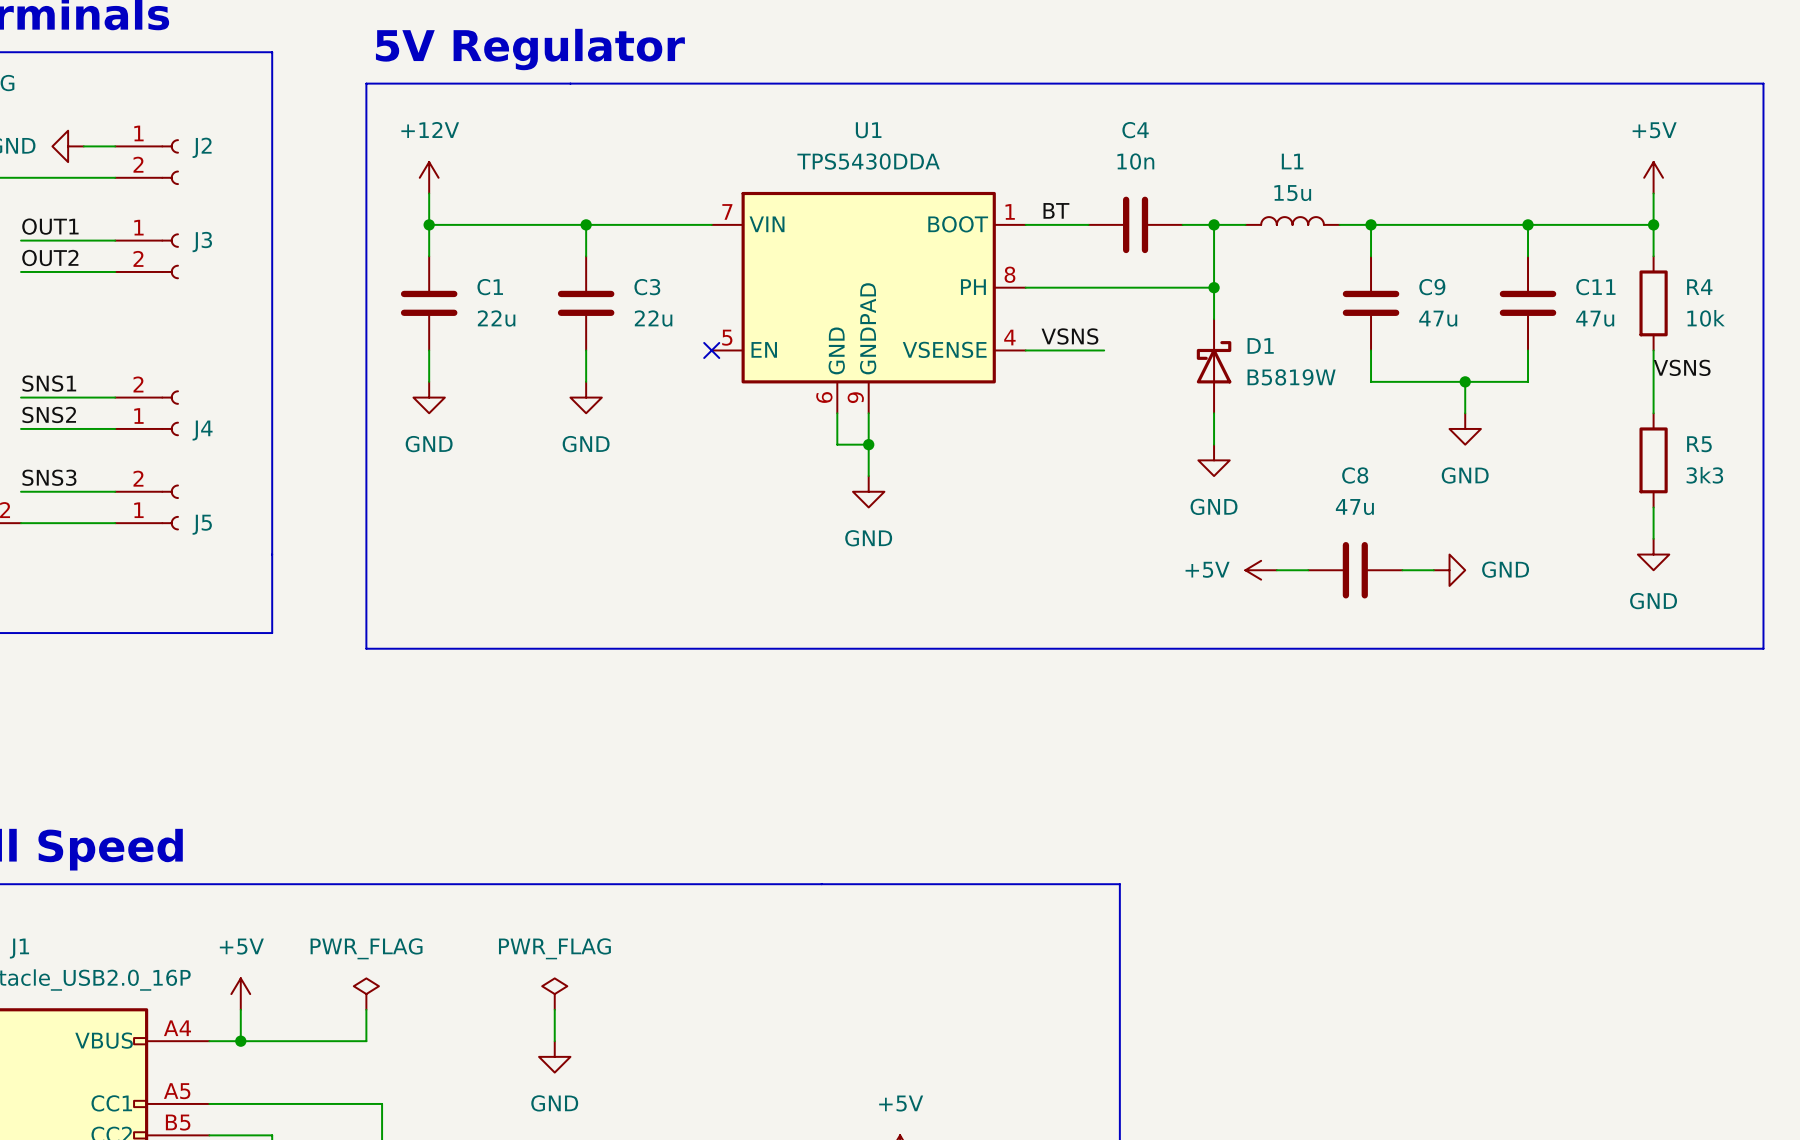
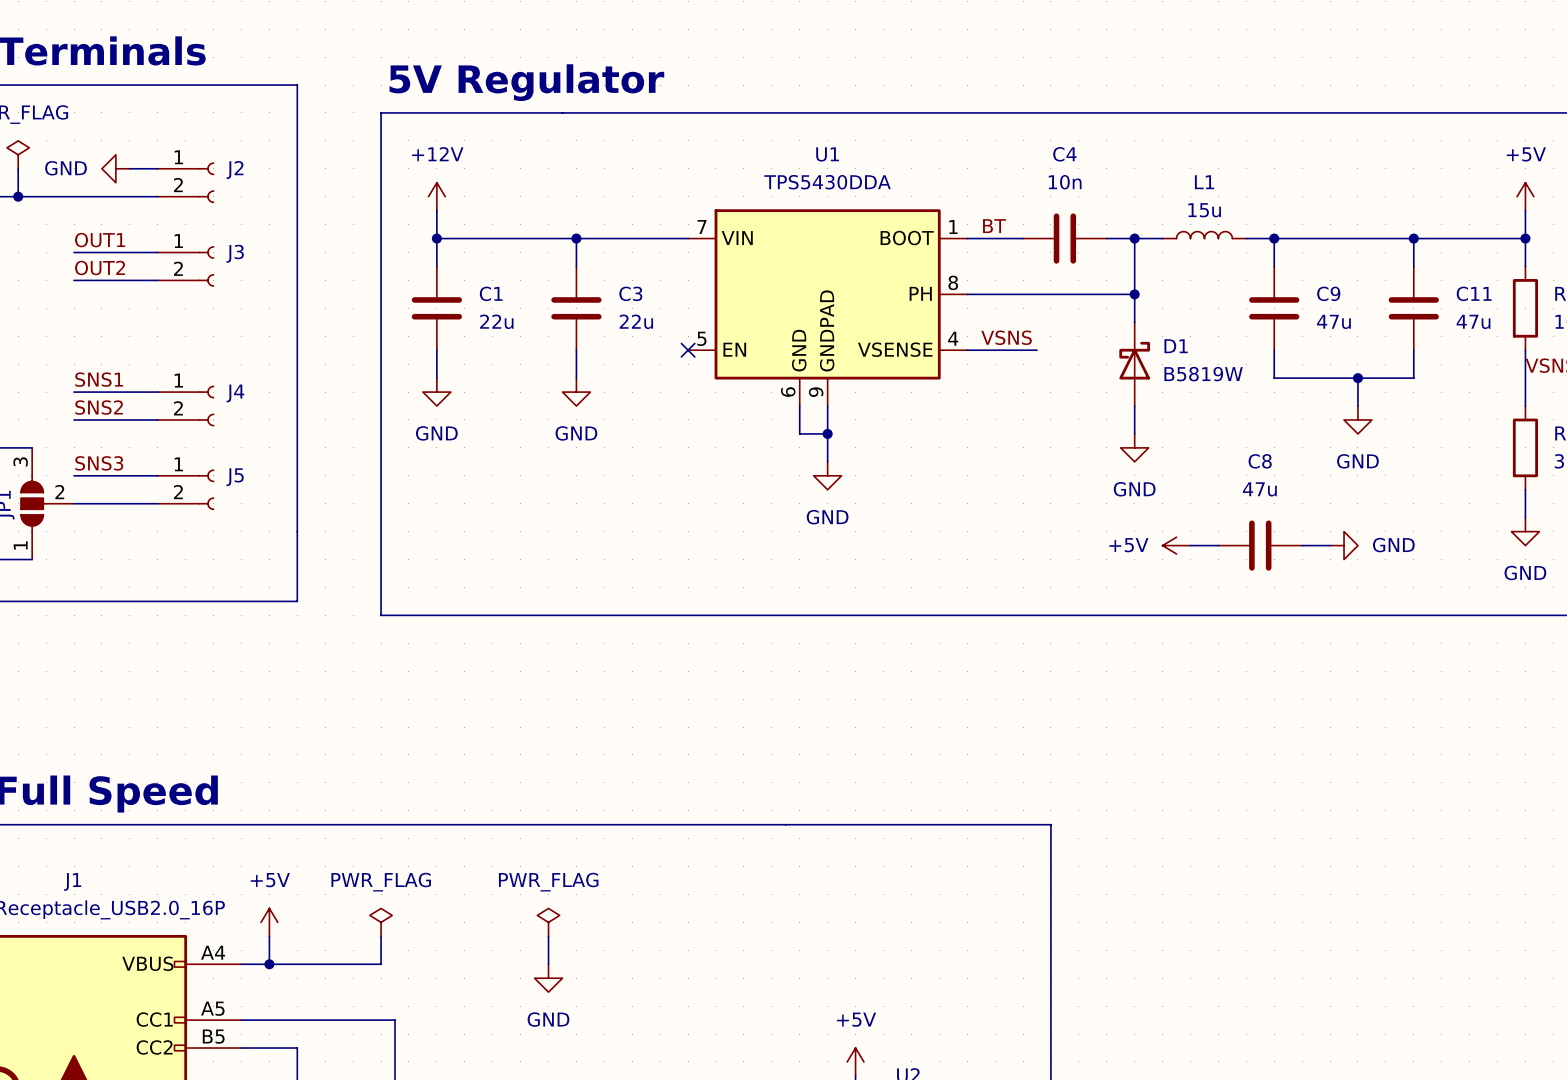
J4 flip: as is (170, 413) -> up-down (206, 406)
J5 flip: as is (170, 507) -> up-down (206, 489)

